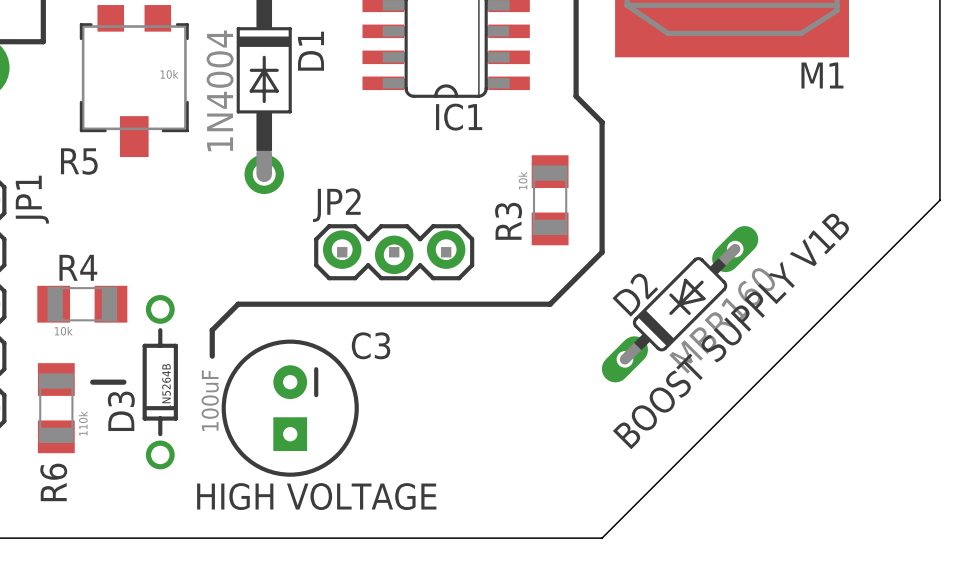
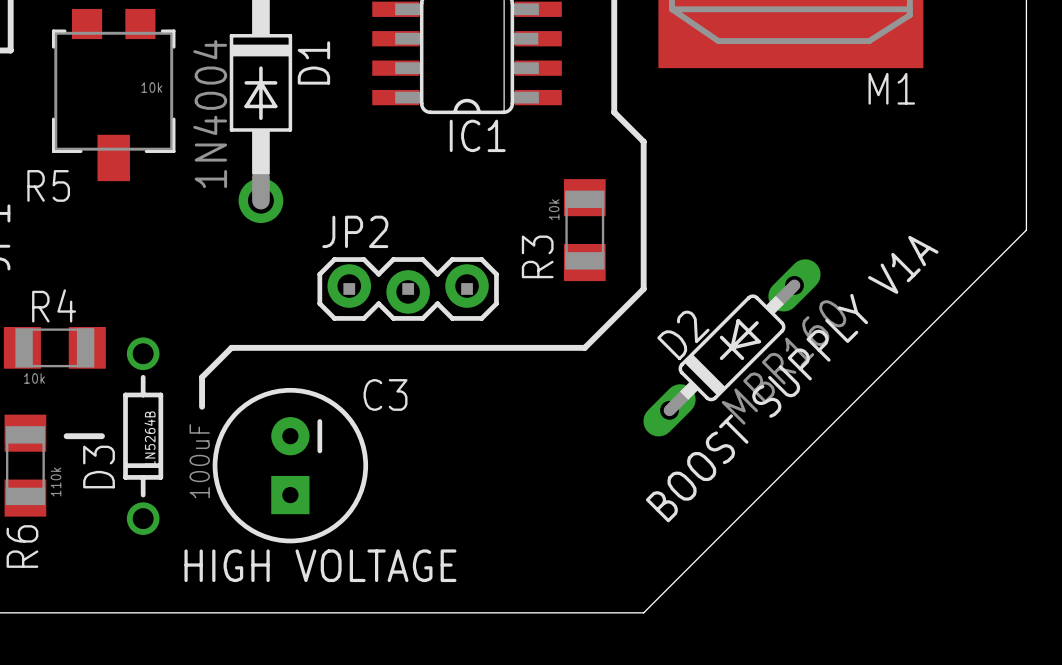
text: BOOST SUPPLY V1B (731, 331) -> BOOST SUPPLY V1A (792, 379)

